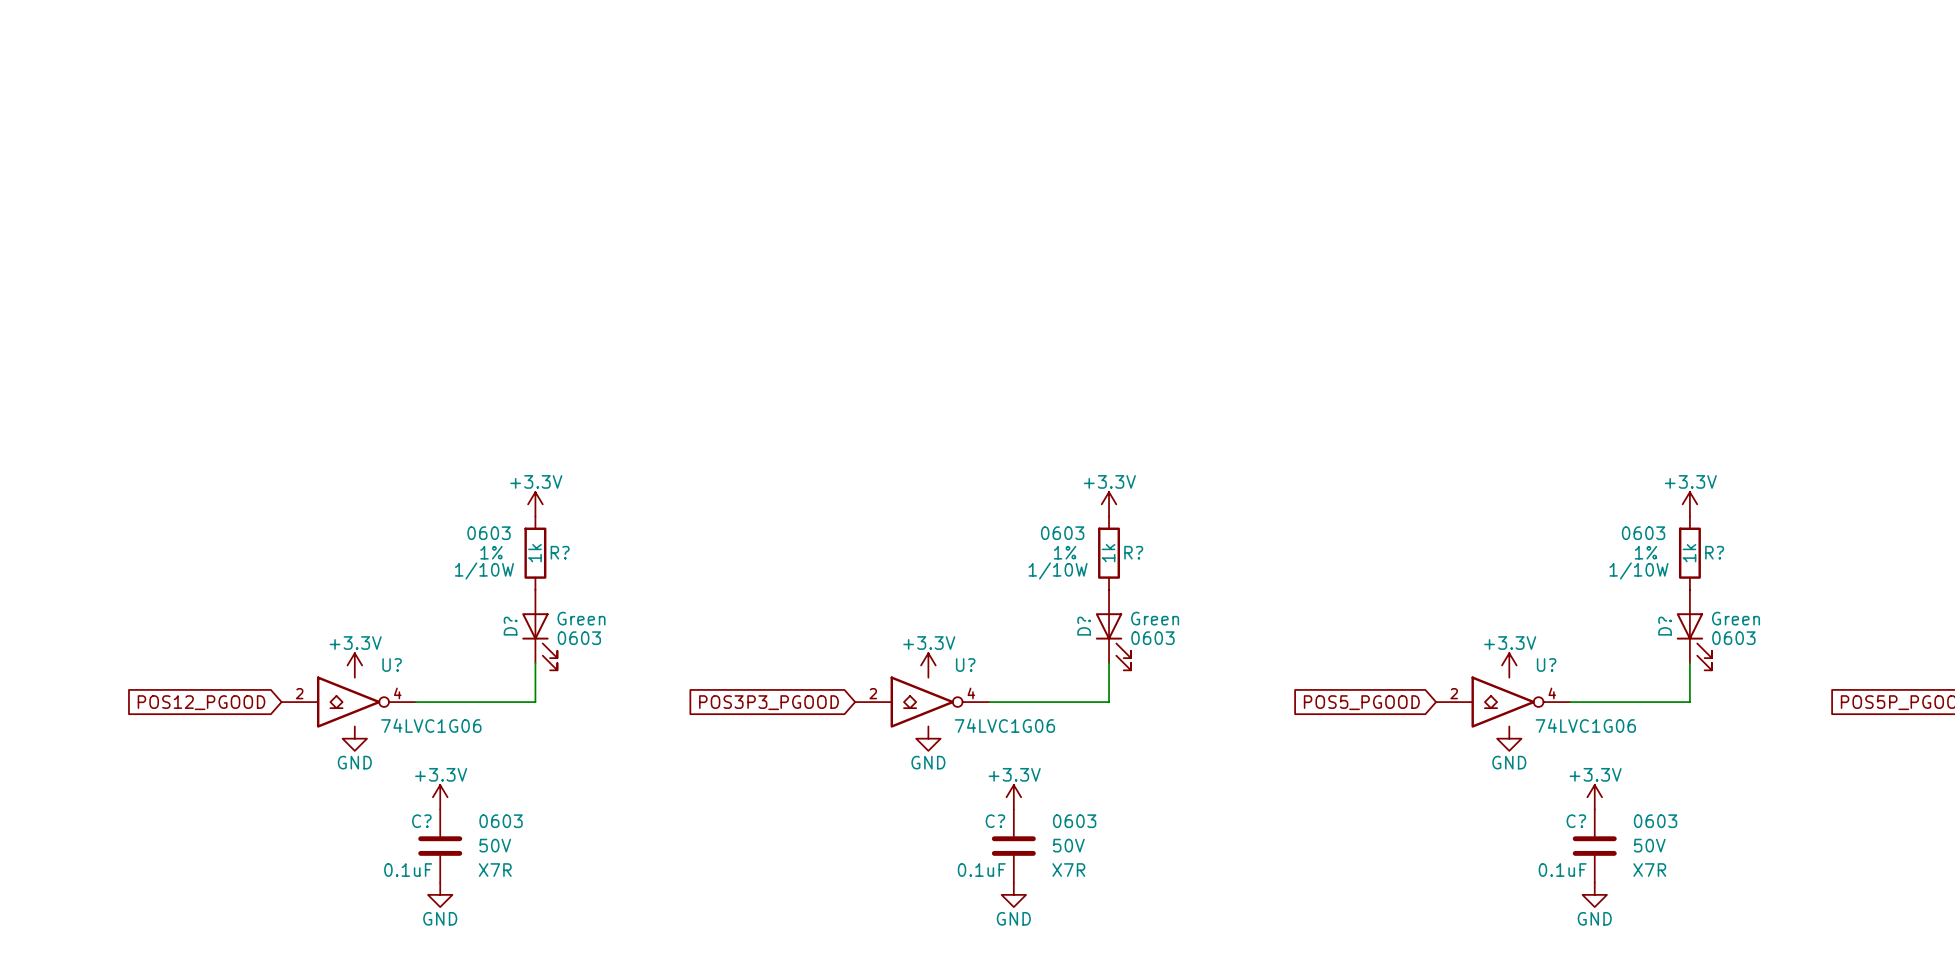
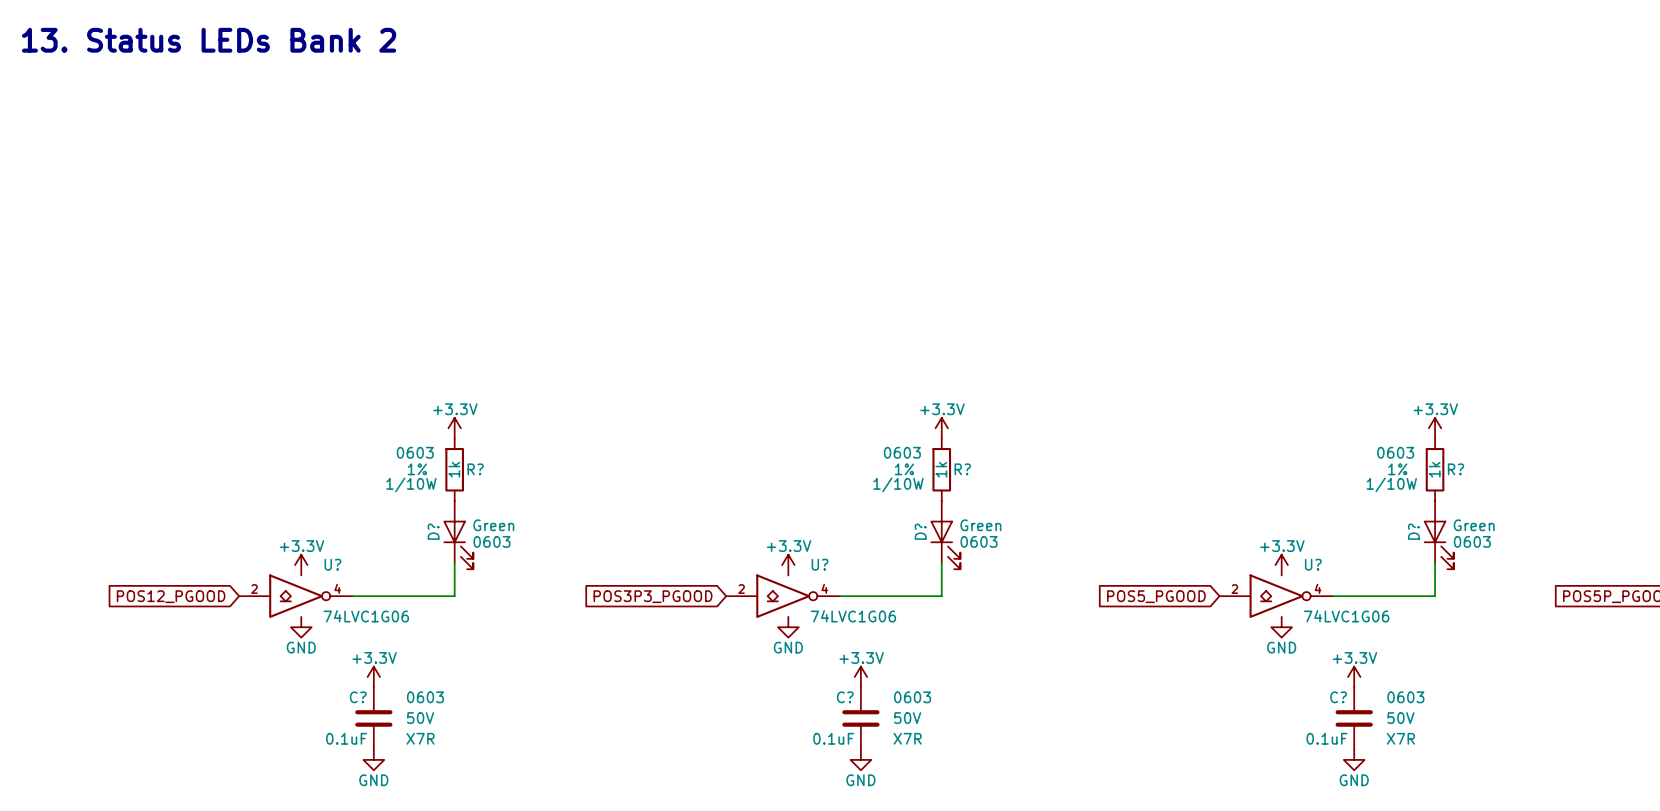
text: none -> 13. Status LEDs Bank 2 (209, 40)

